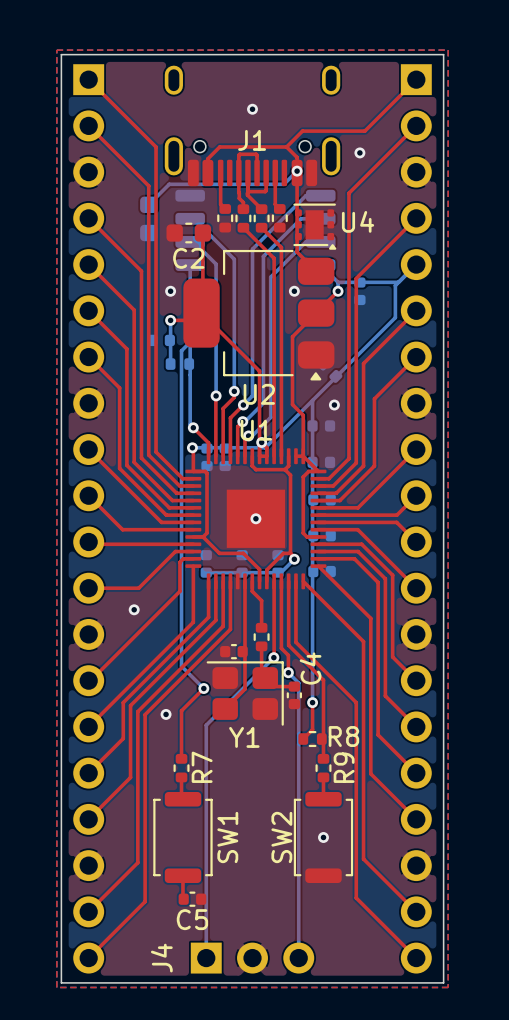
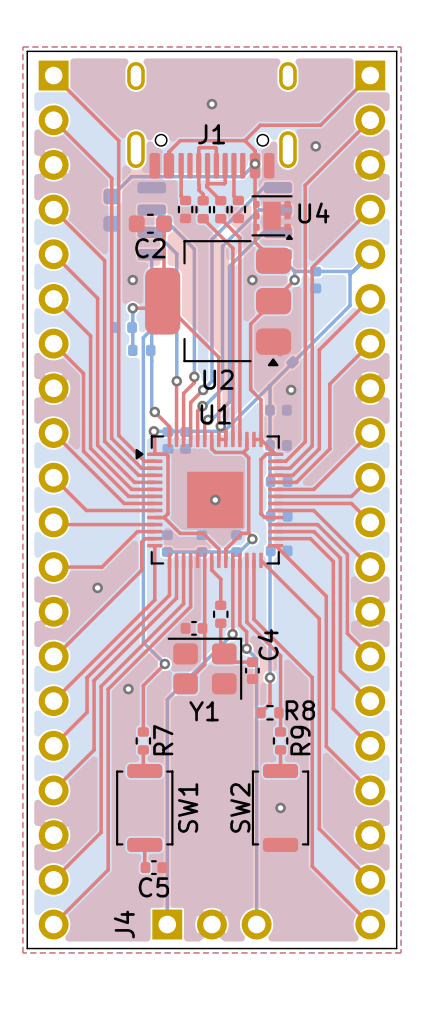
U1 footprint: [185, 448, 327, 590] -> [135, 431, 284, 569]

